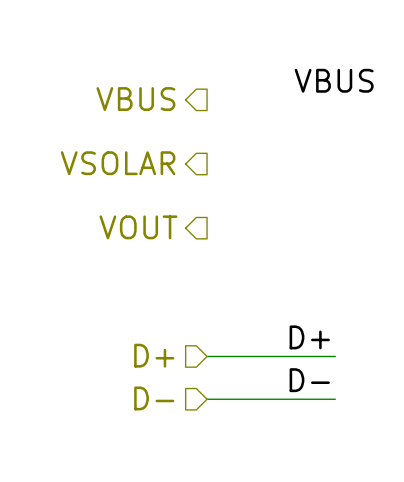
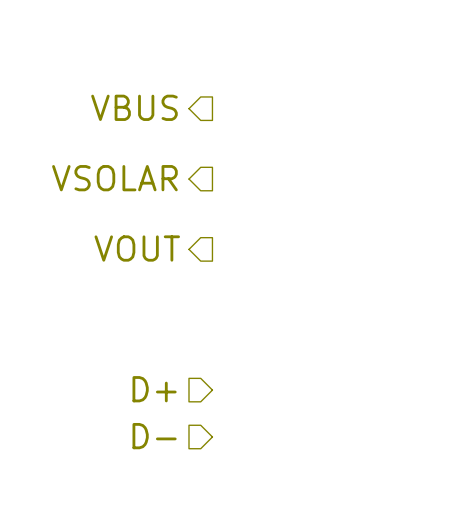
label: VBUS (334, 80) -> none
label: D+ (309, 337) -> none
wire: (207, 356) (335, 356) -> none
label: D- (309, 380) -> none
wire: (207, 399) (335, 399) -> none

